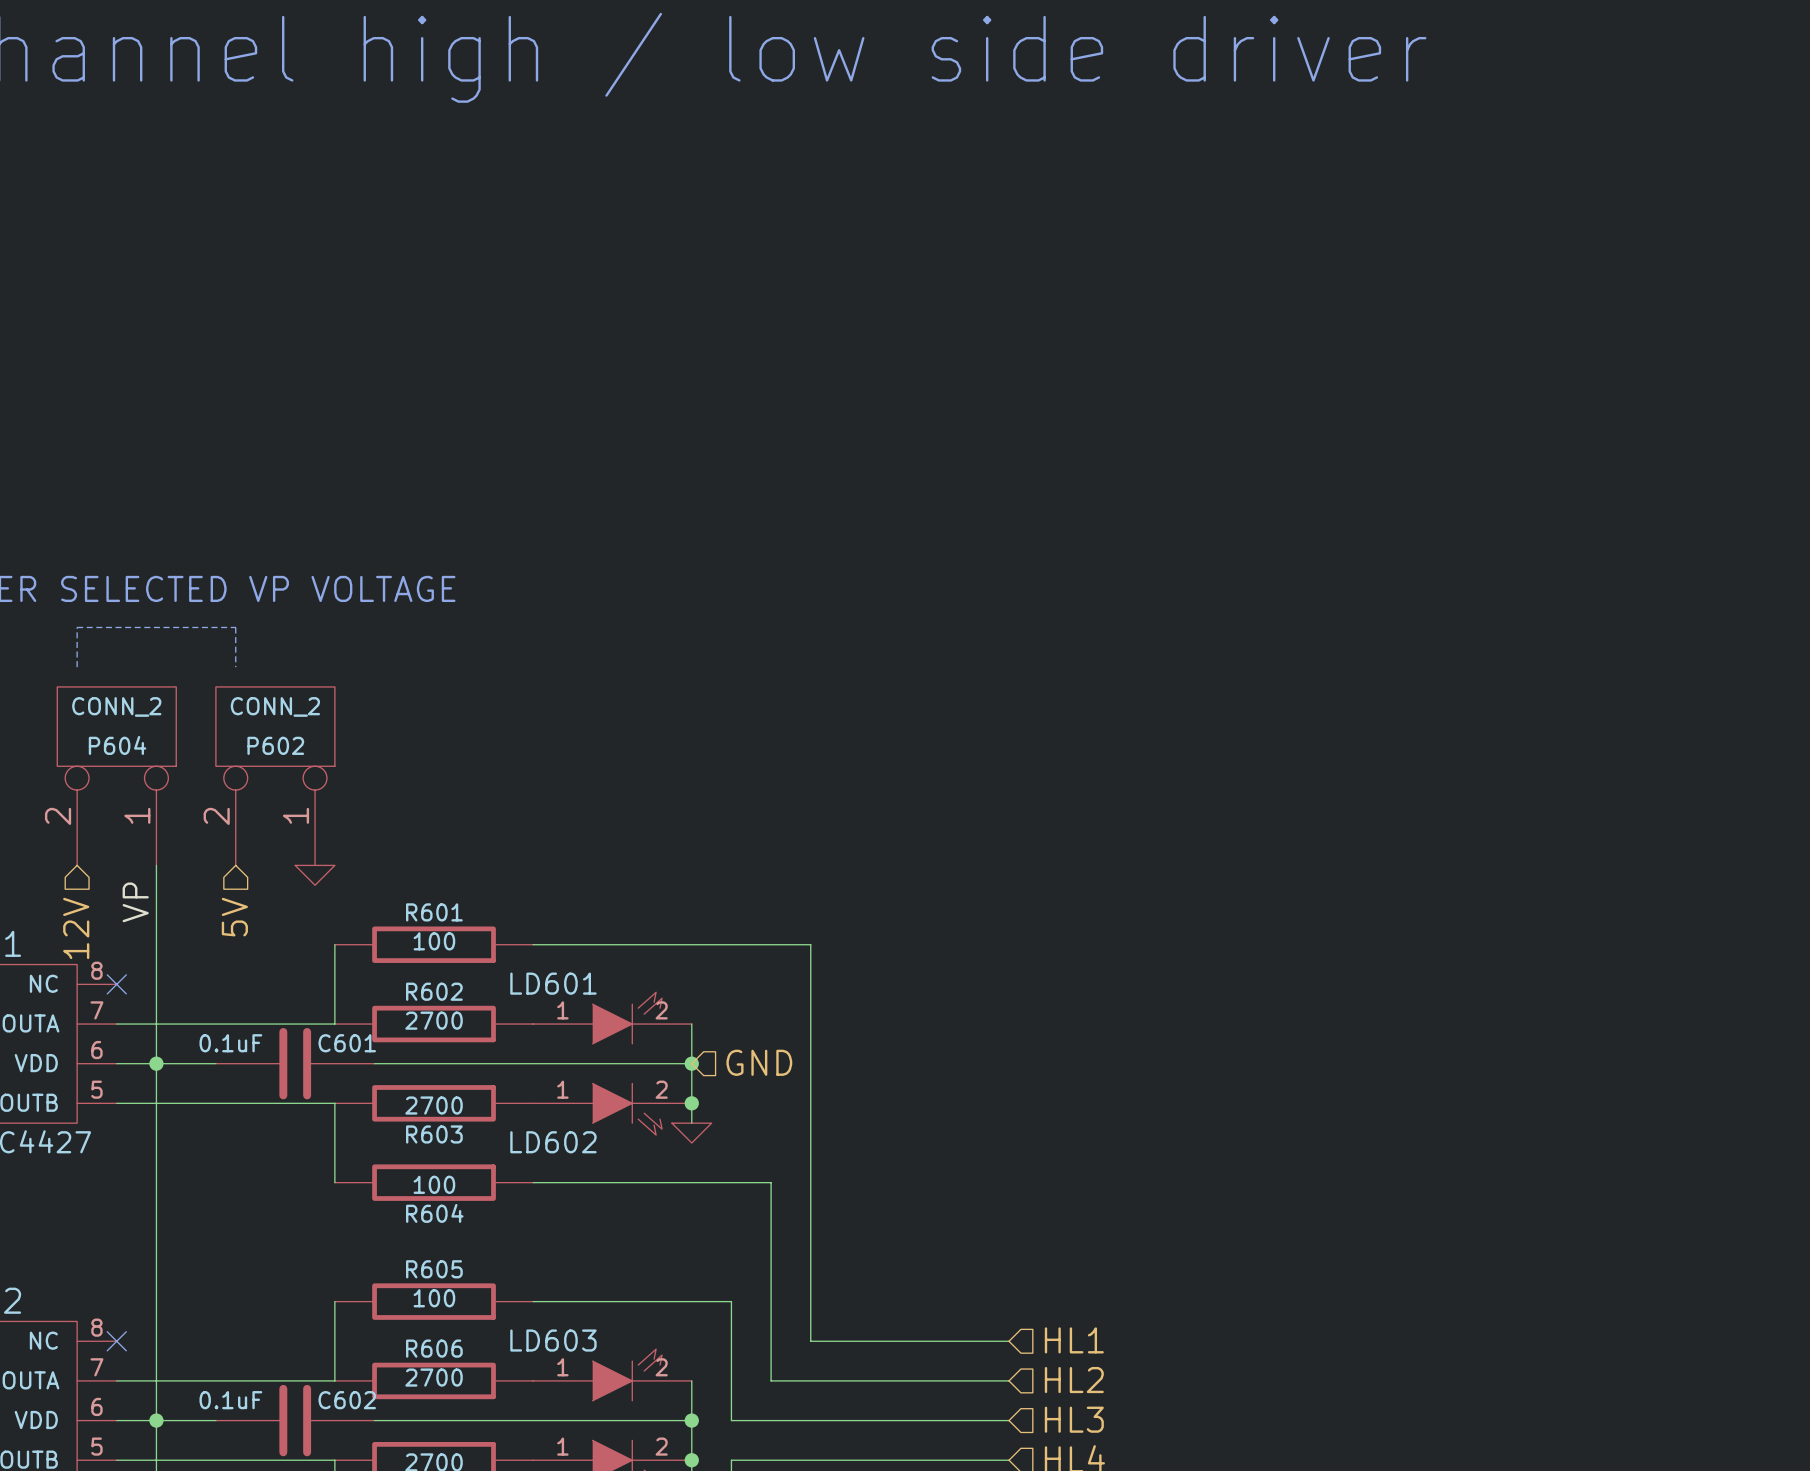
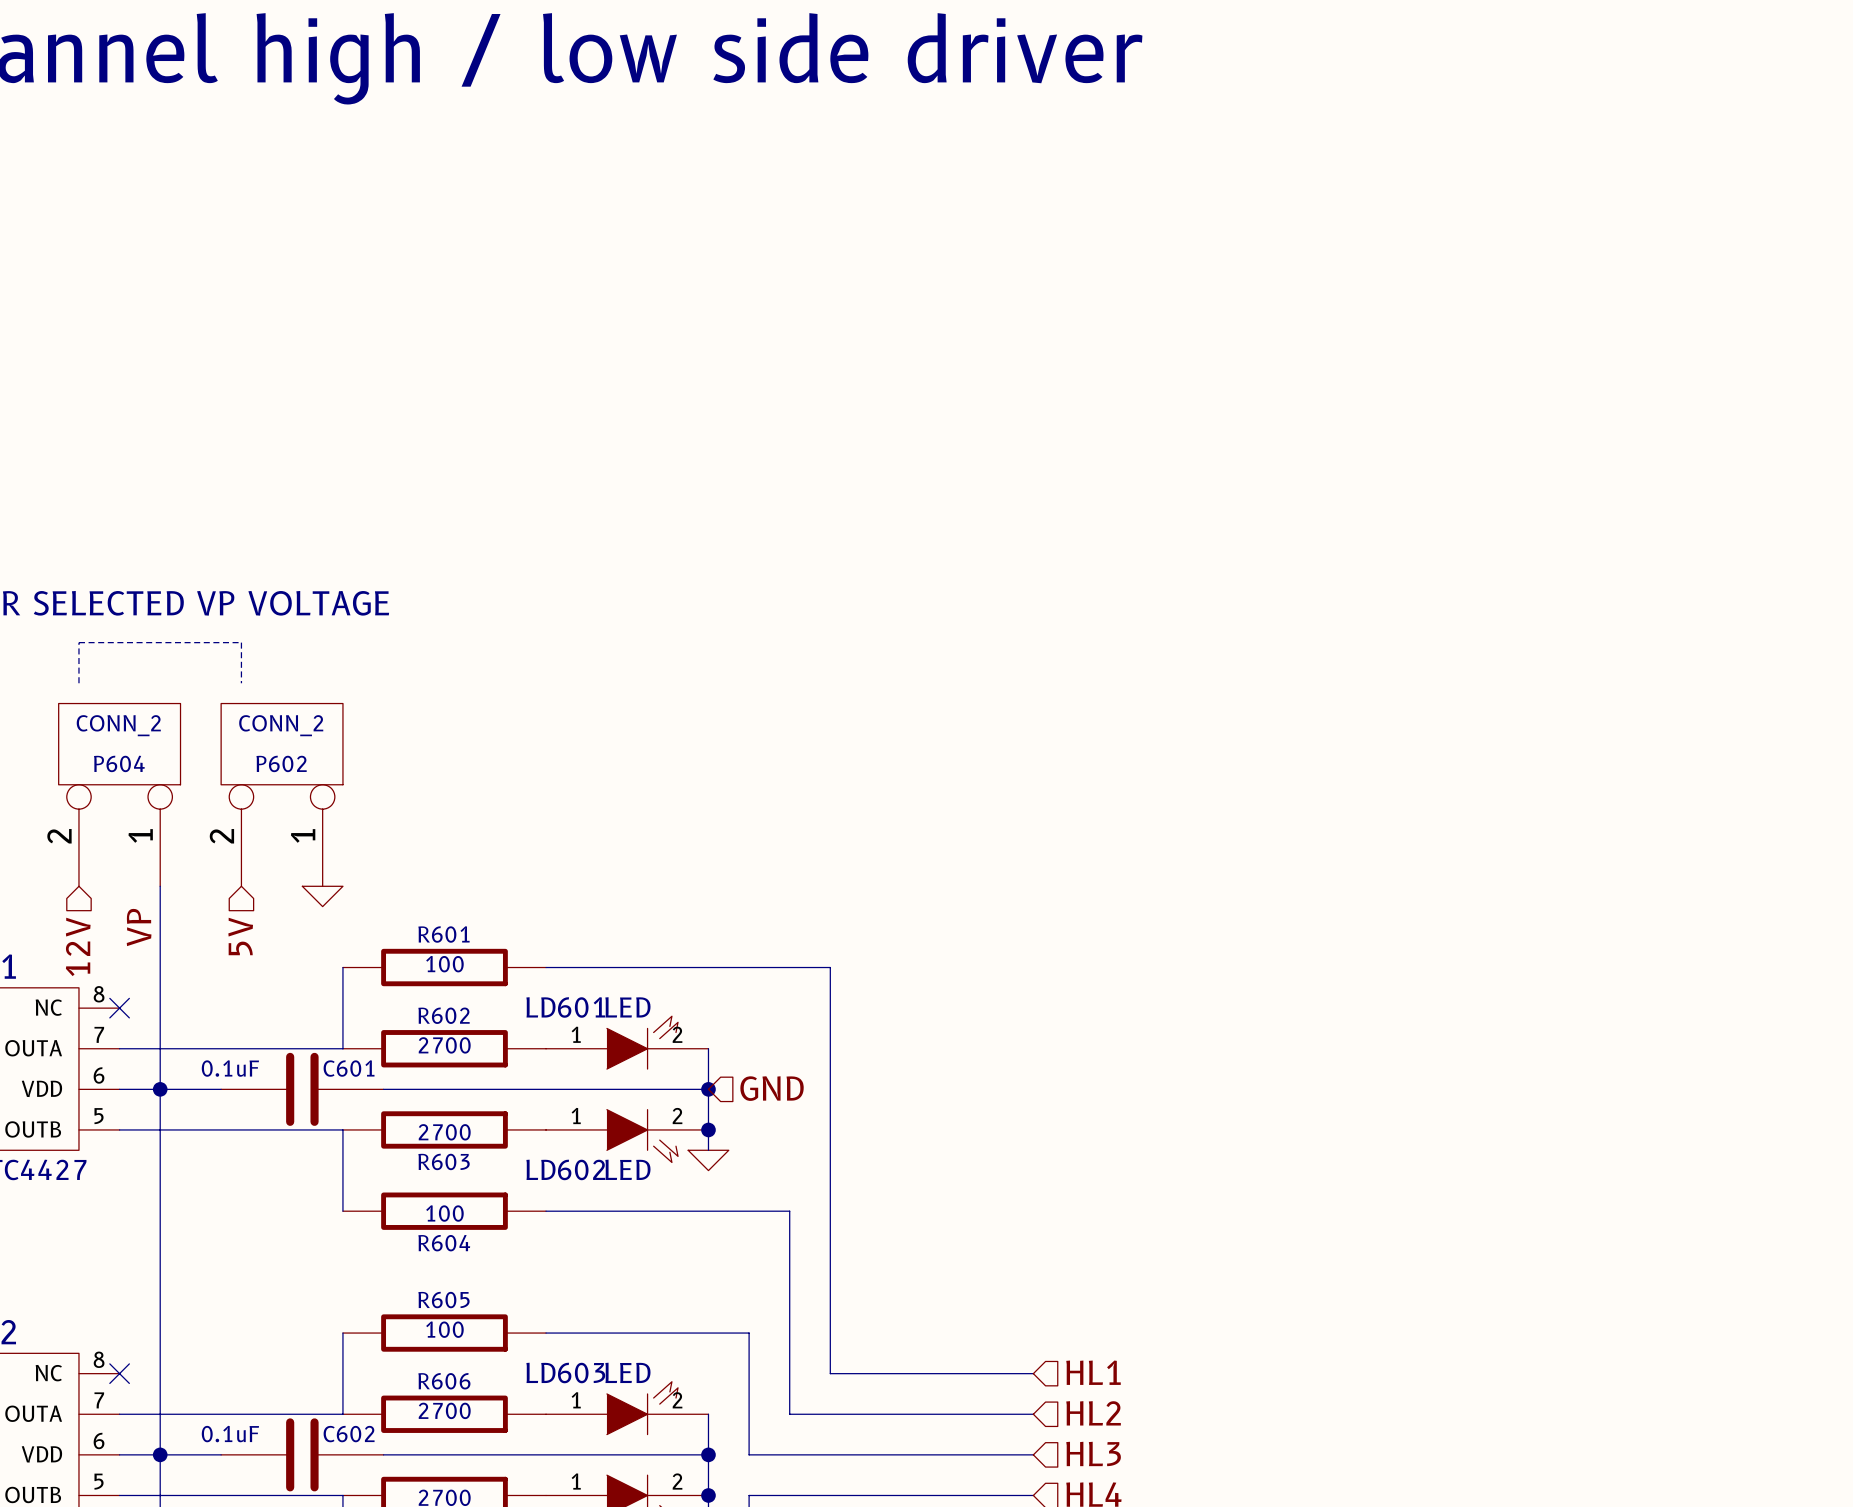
LD601 value: none -> LED (627, 1007)
LD602 value: none -> LED (627, 1169)
LD603 value: none -> LED (627, 1372)

